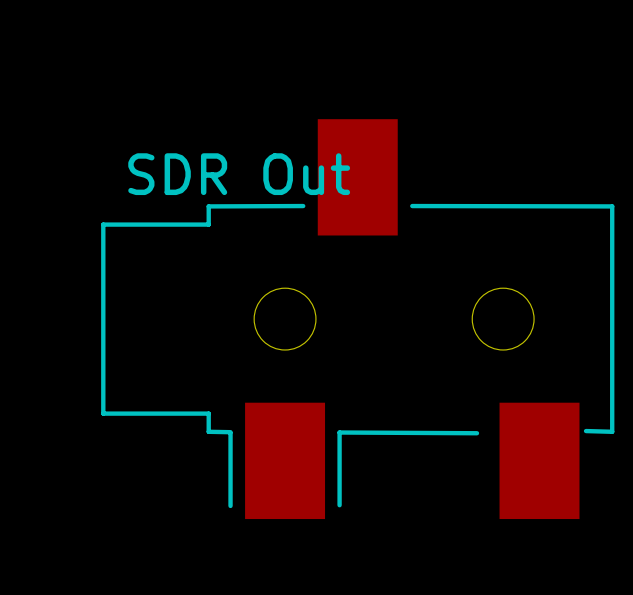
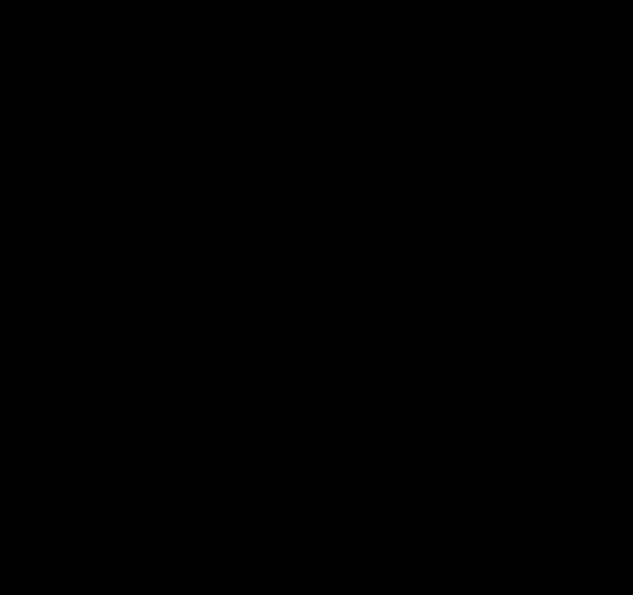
part: SDR Out (357, 319) -> none

